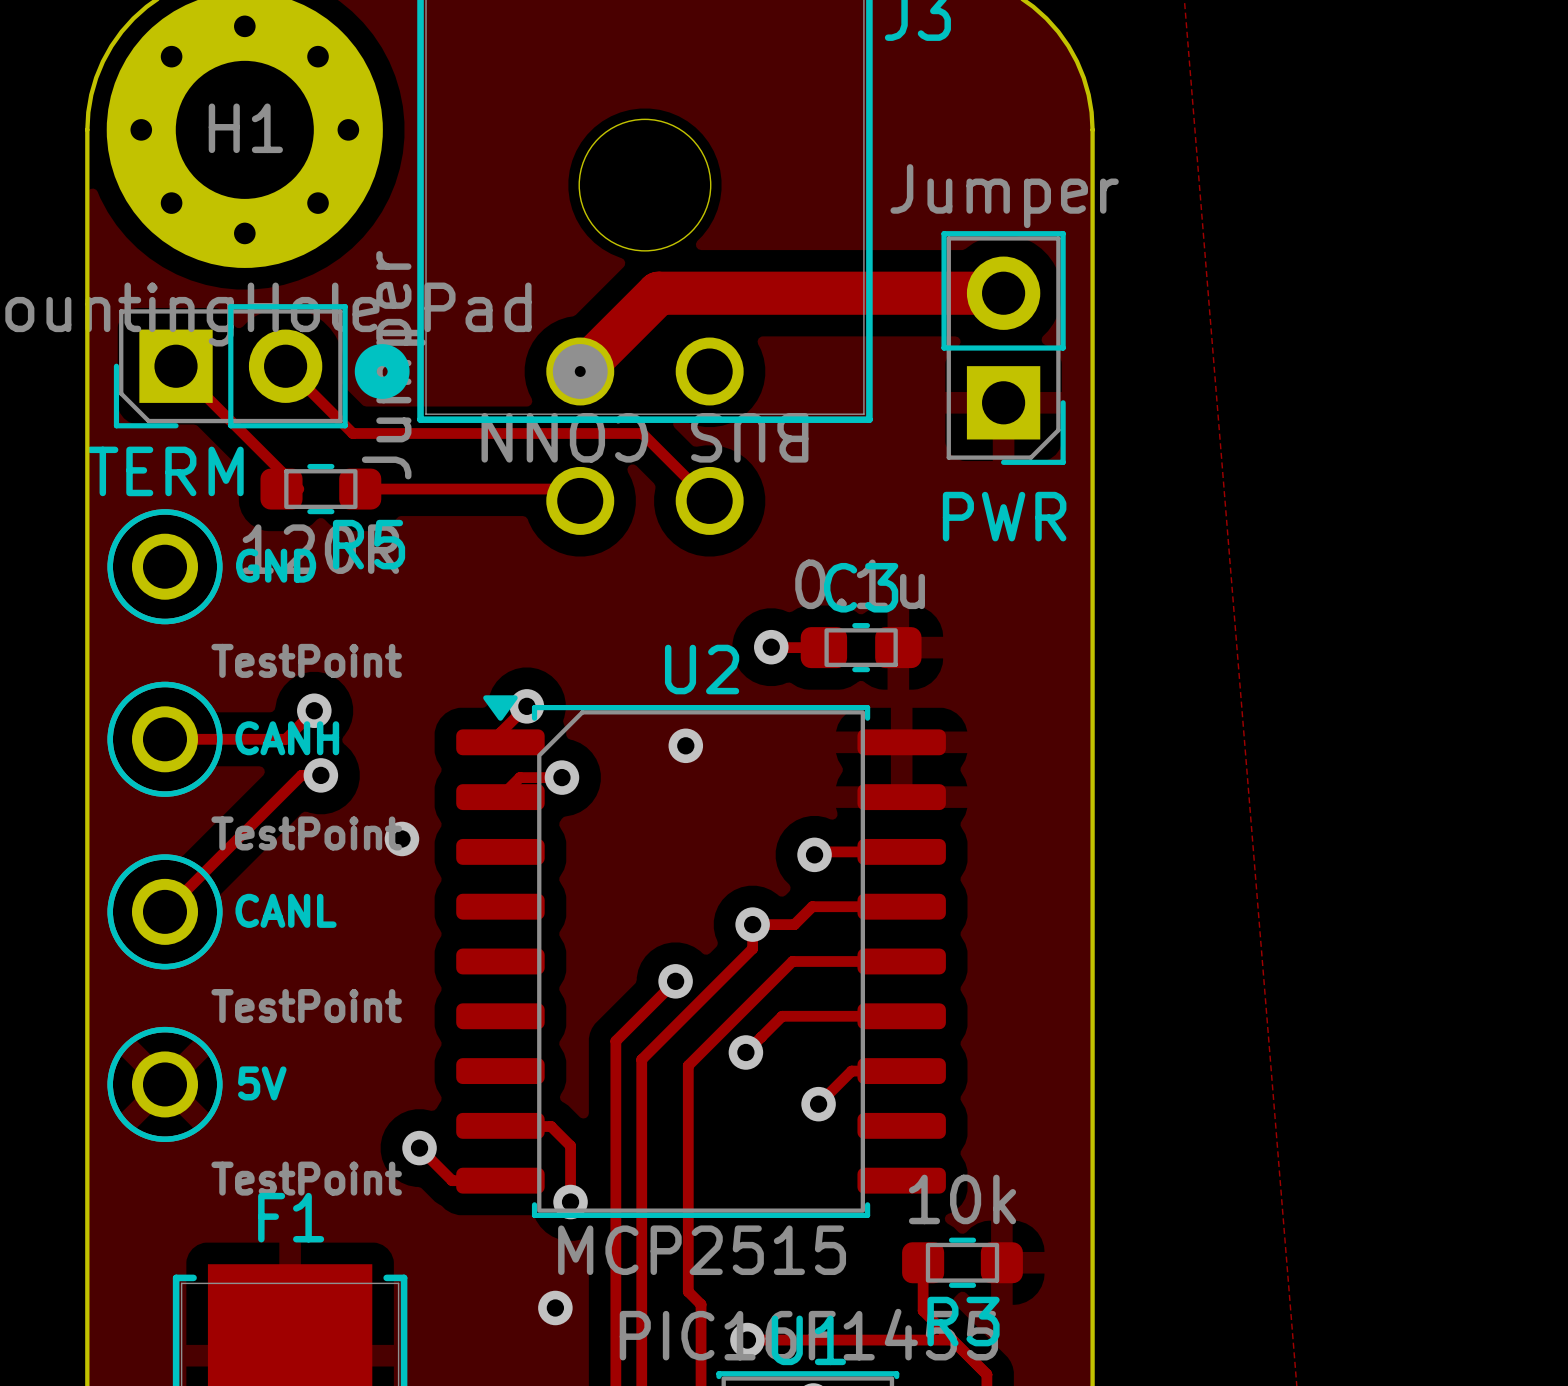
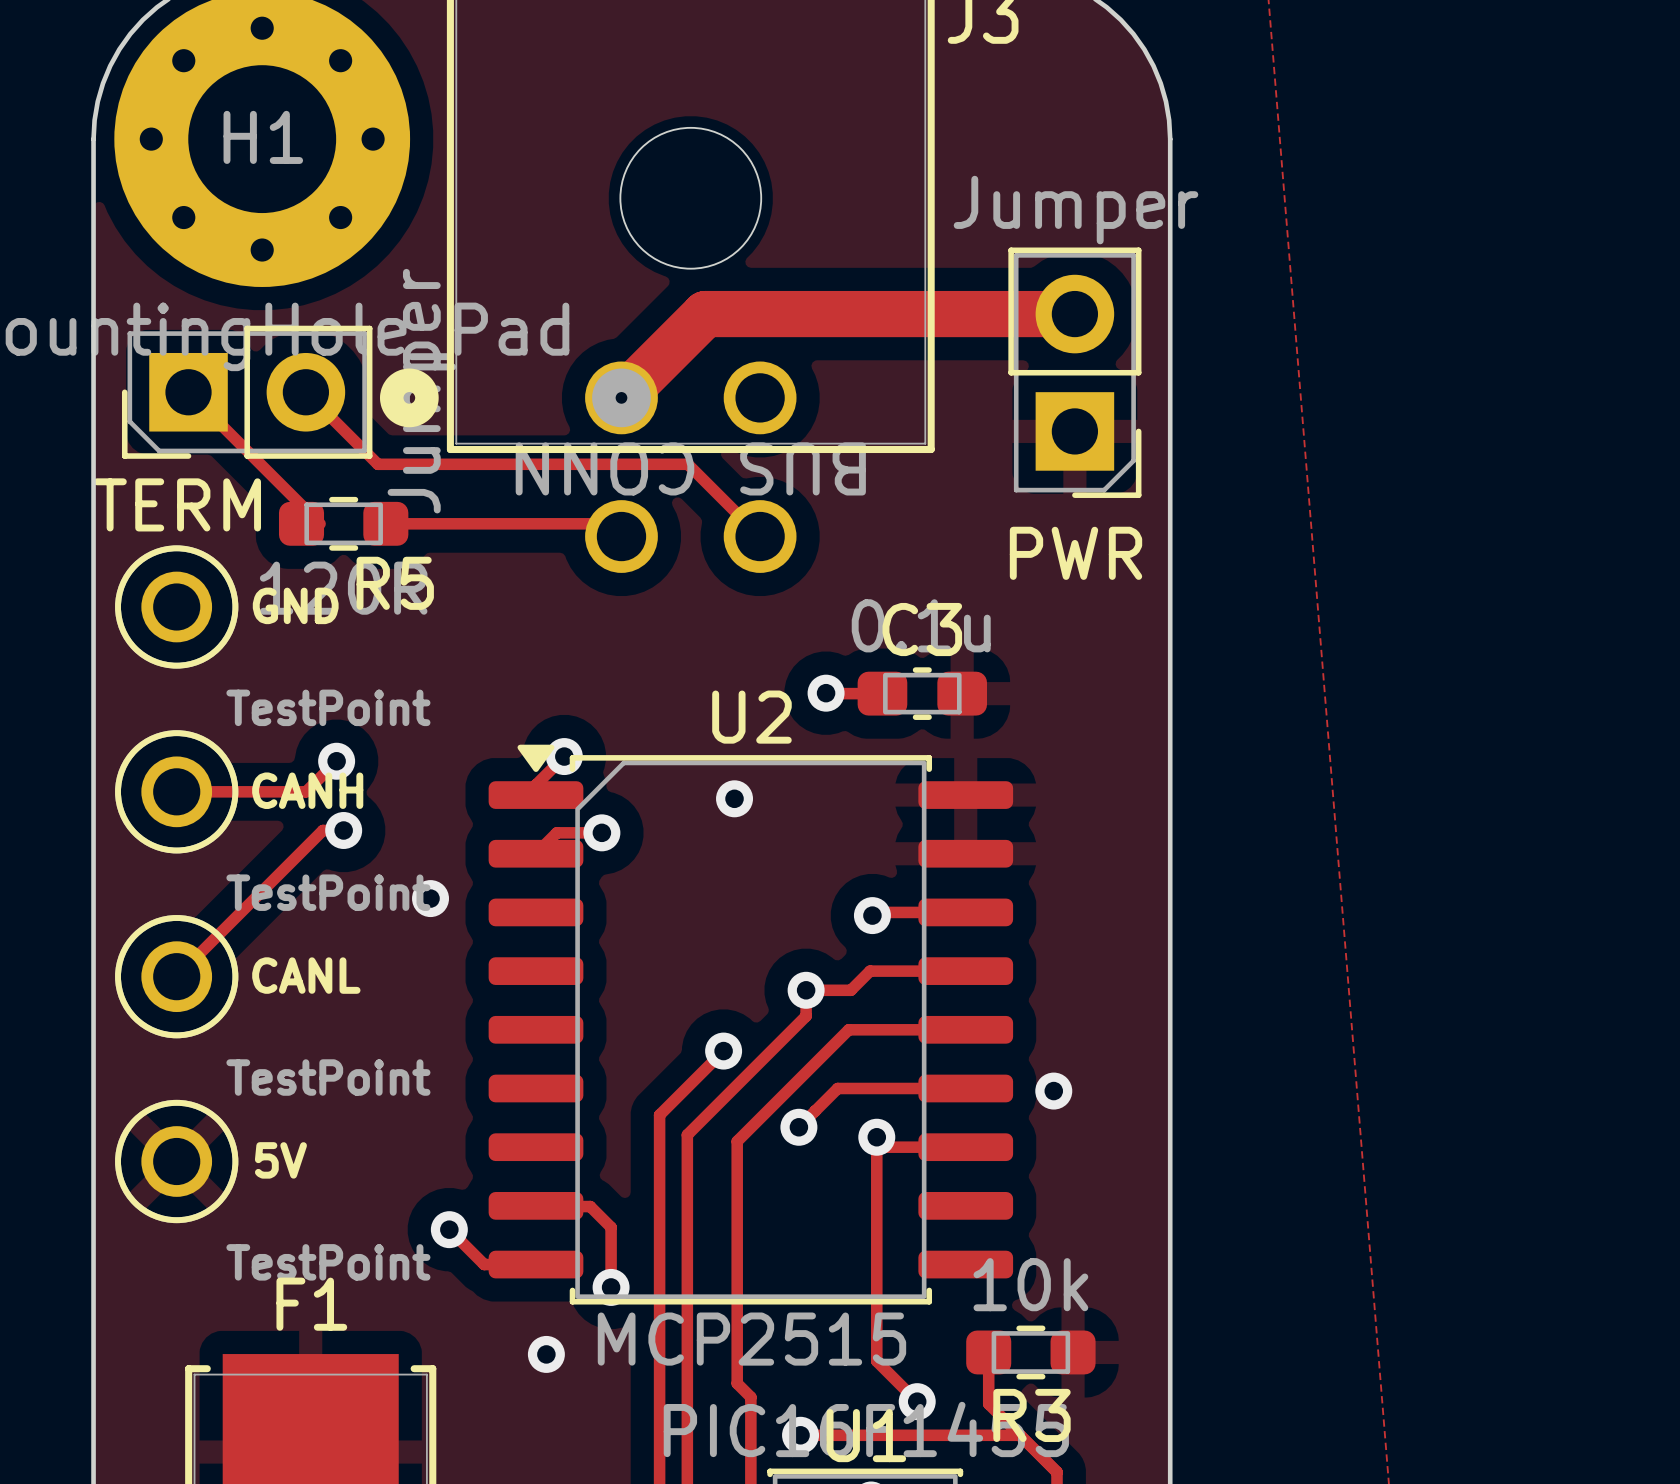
via: none -> (1053, 1091)
track: (851, 1071) (818, 1104) -> (912, 1147) (886, 1147) (876, 1137) (876, 1361) (917, 1401)
via position: (818, 1104) -> (876, 1137)
via position: (555, 1307) -> (546, 1354)
via: none -> (917, 1401)

